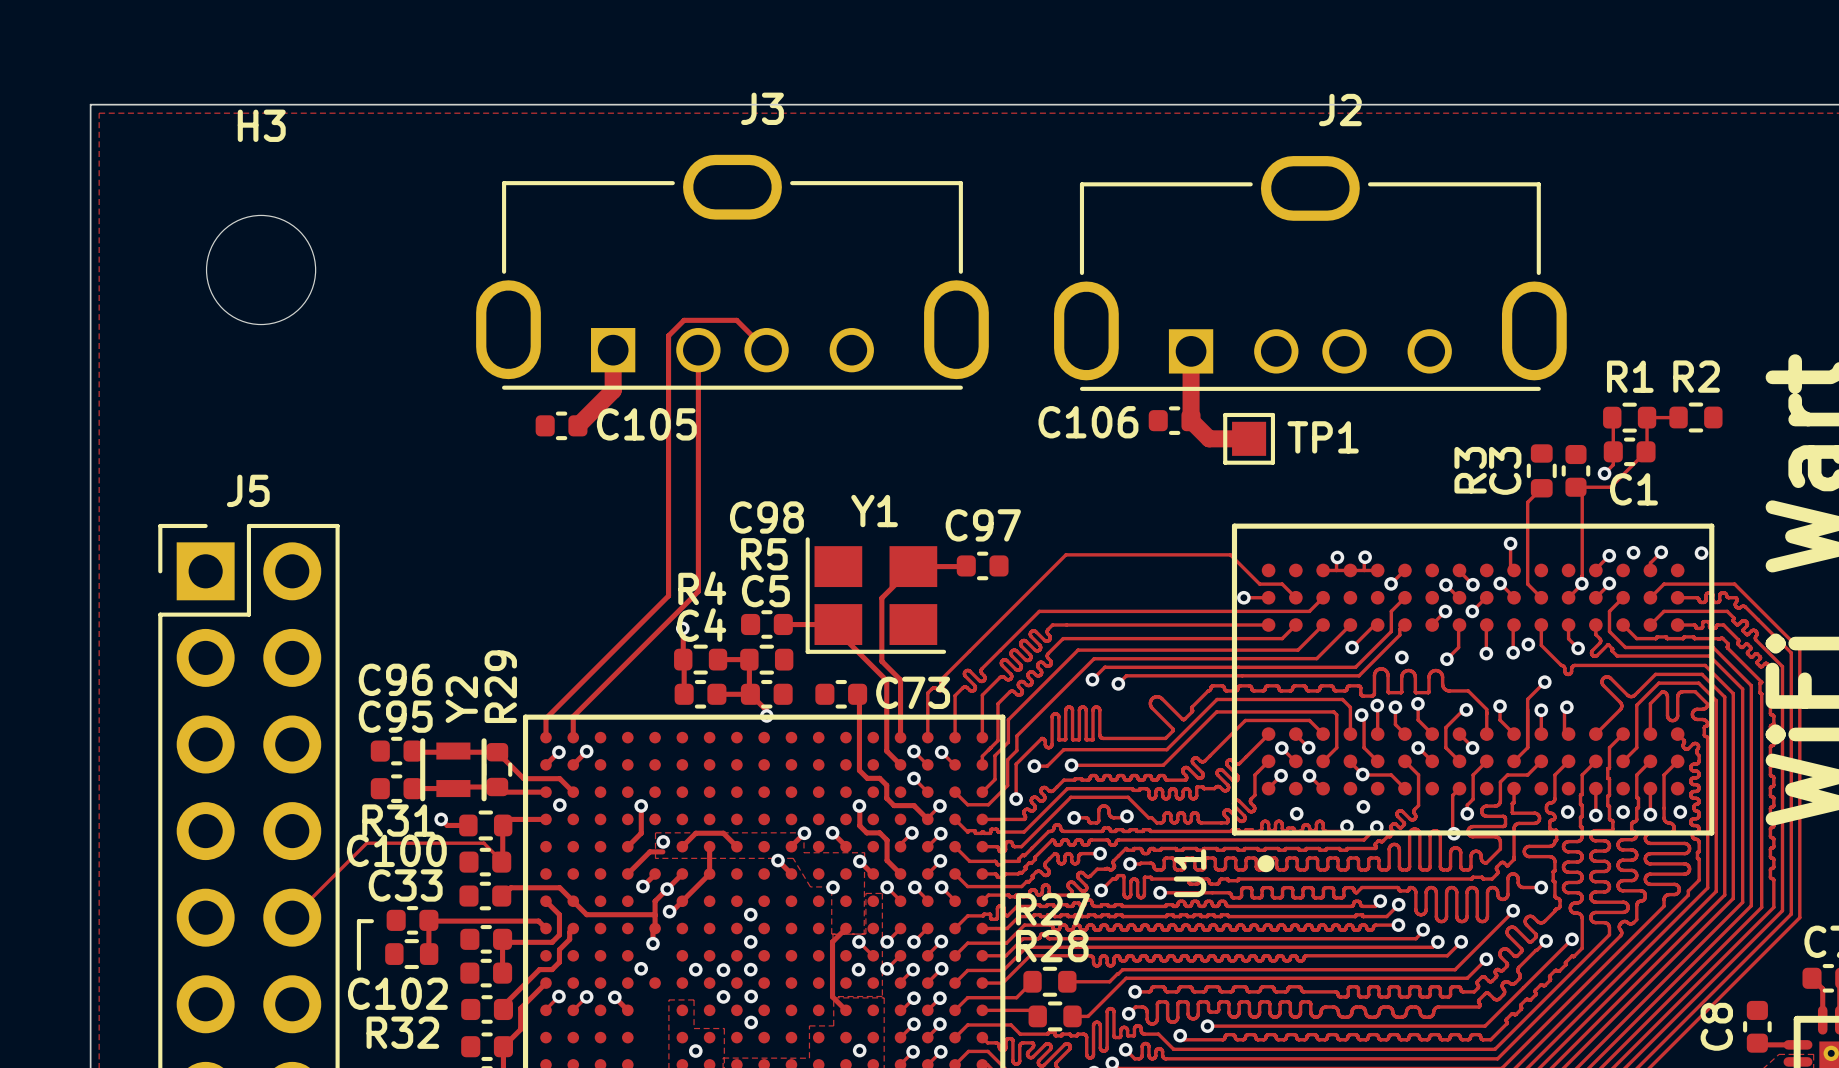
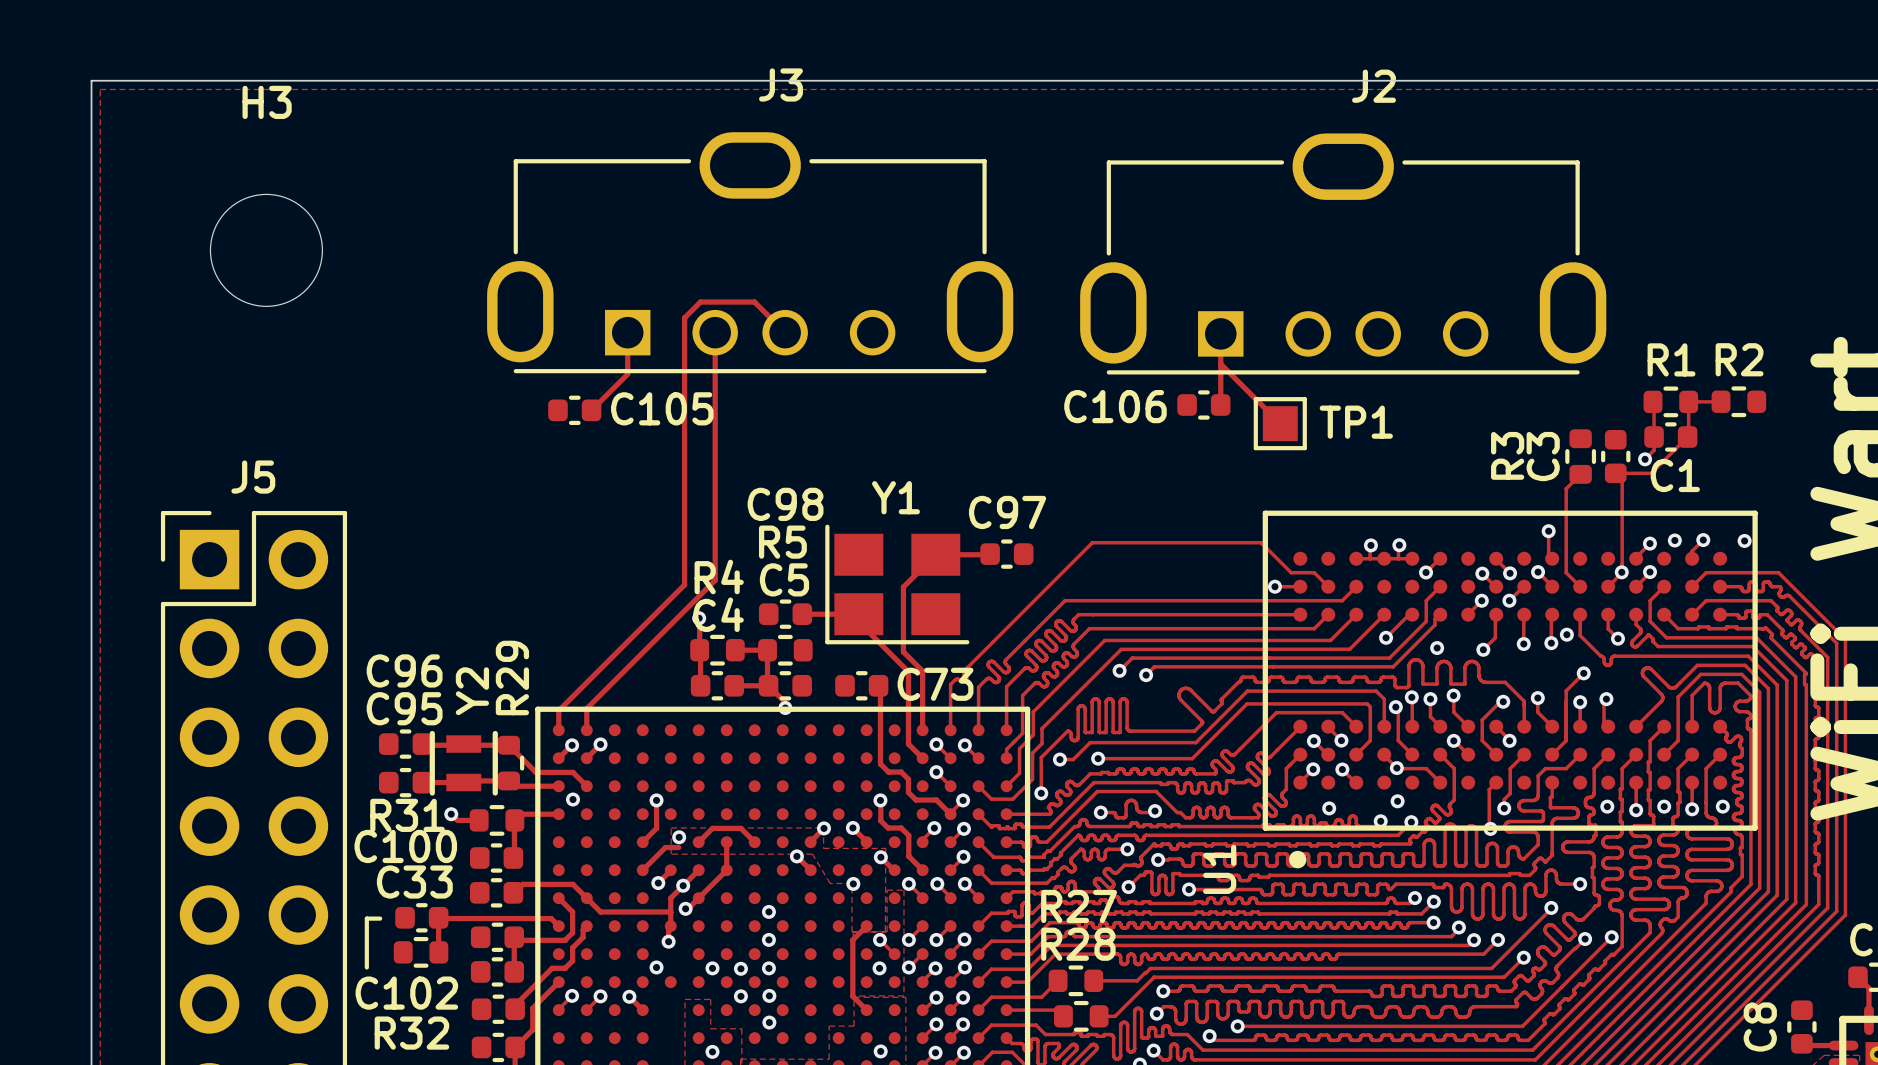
track width: thick (613, 350) (613, 390) (577, 425) -> thin (627, 332) (627, 374) (591, 410)
track width: thick (1191, 351) (1191, 420) -> thin (1220, 333) (1220, 404)
track: (1190, 420) (1209, 438) (1249, 438) -> (1220, 364) (1280, 423)
track: (502, 862) (483, 843) (366, 843) (292, 917) -> none

